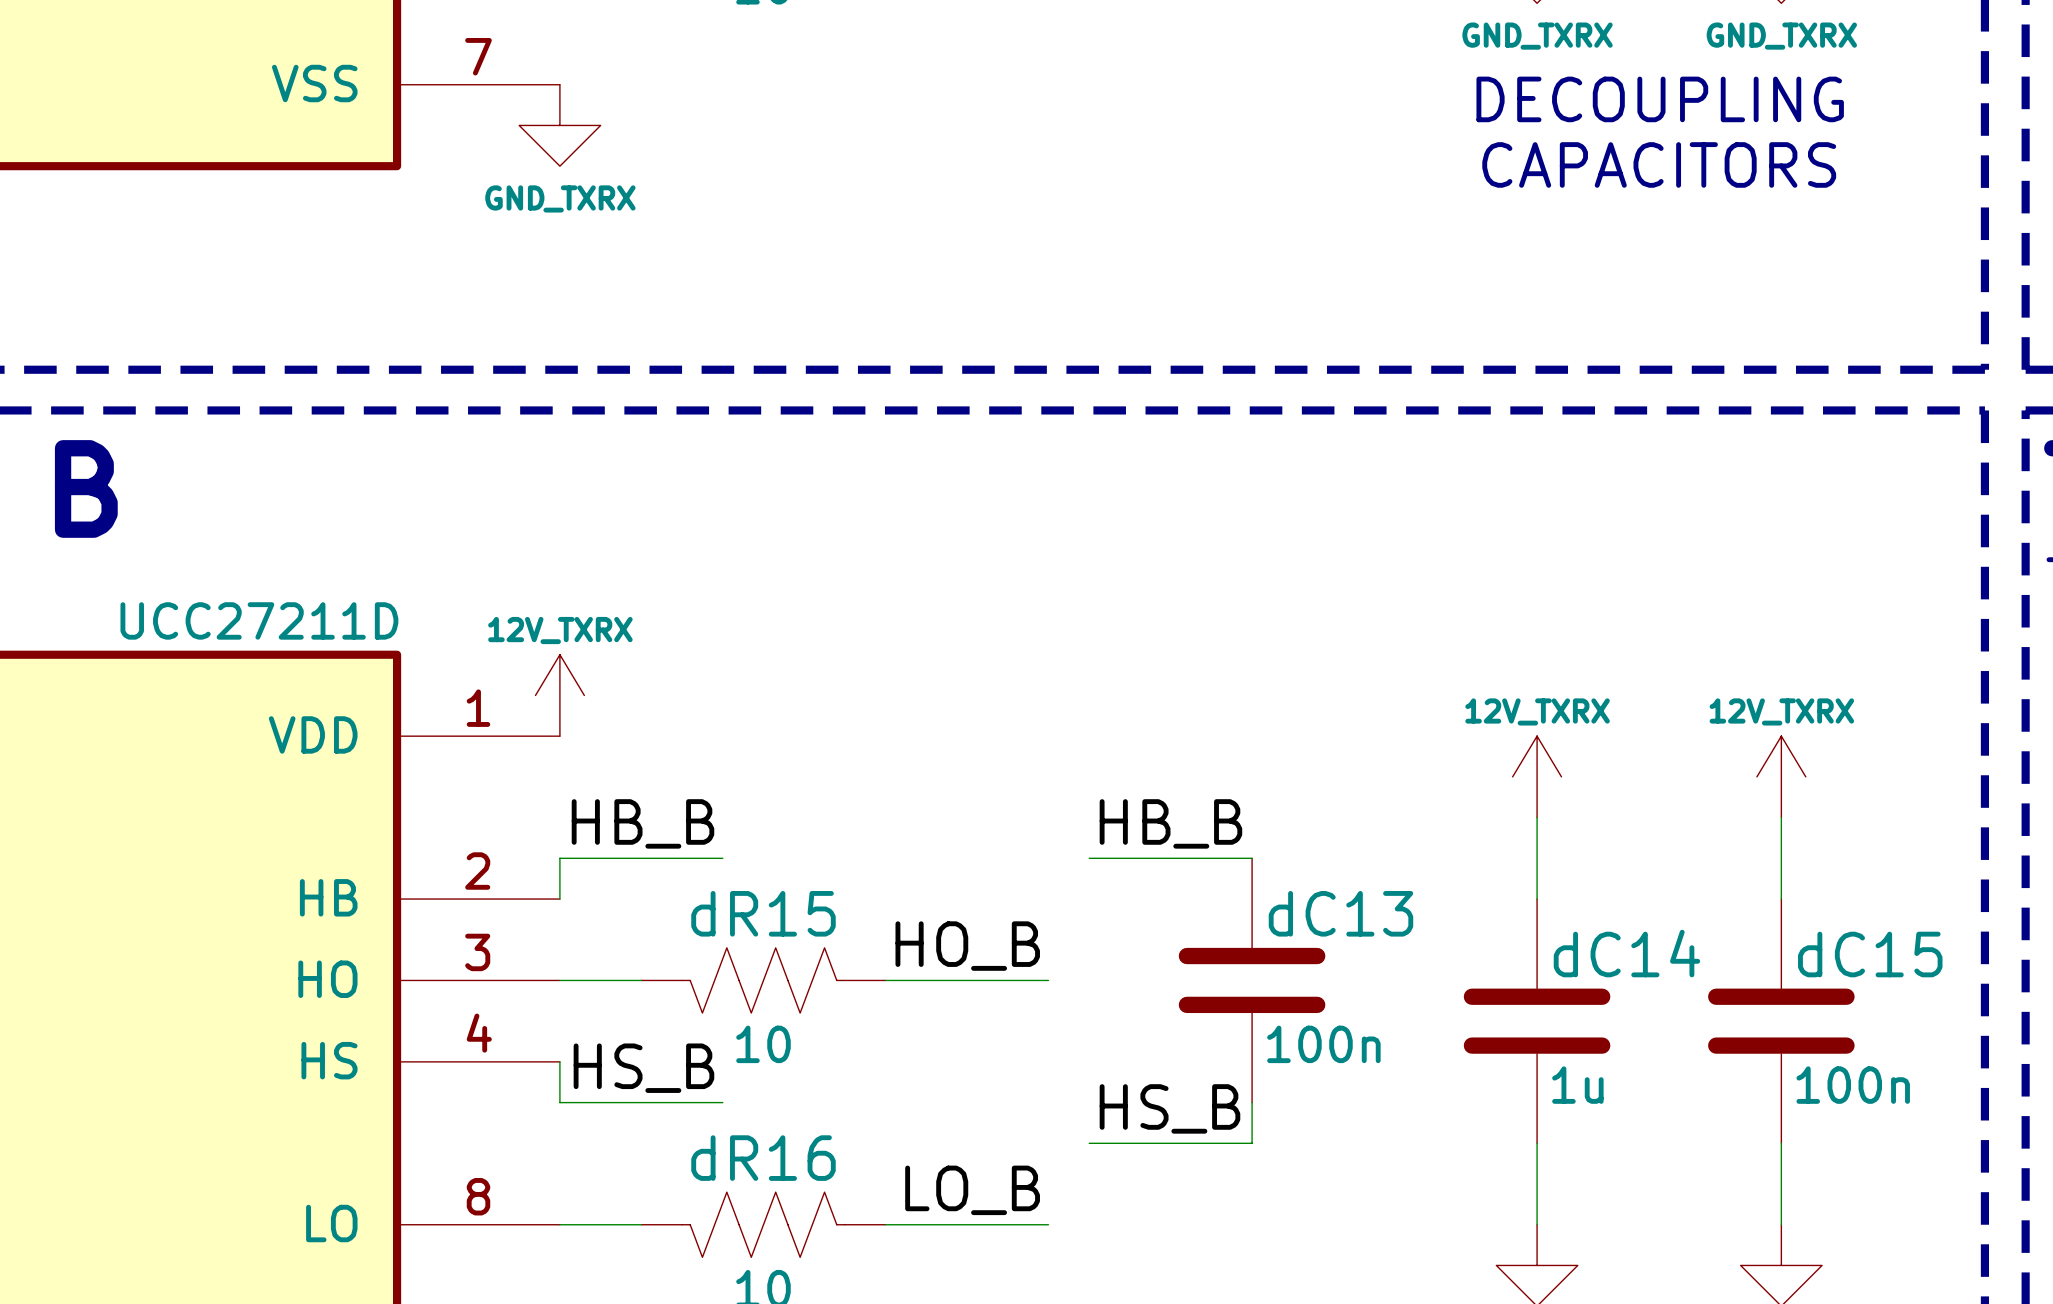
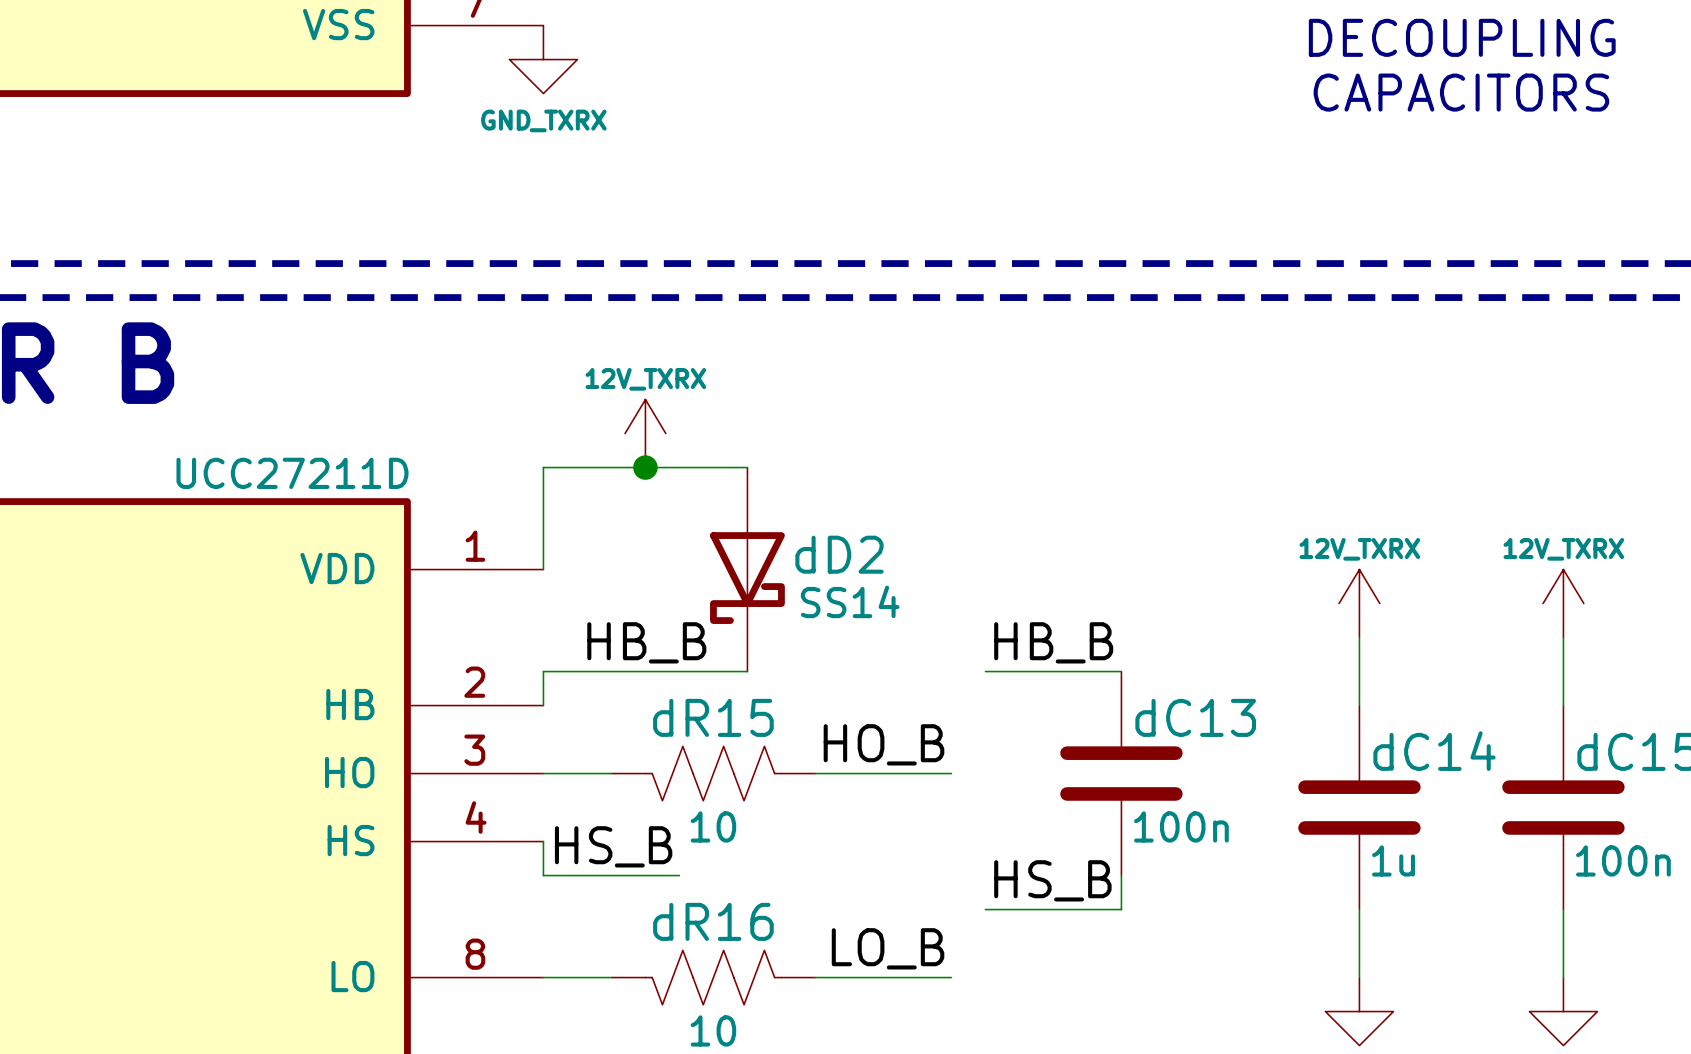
junction: none -> (645, 467)
wire: none -> (747, 467) (543, 467) (543, 569)
power symbol position: 12V_TXRX (559, 695) -> 12V_TXRX (645, 433)
dD2: none -> SS14 (747, 569)
label position: HB_B (642, 823) -> HB_B (646, 642)
wire: none -> (679, 671) (747, 671)

